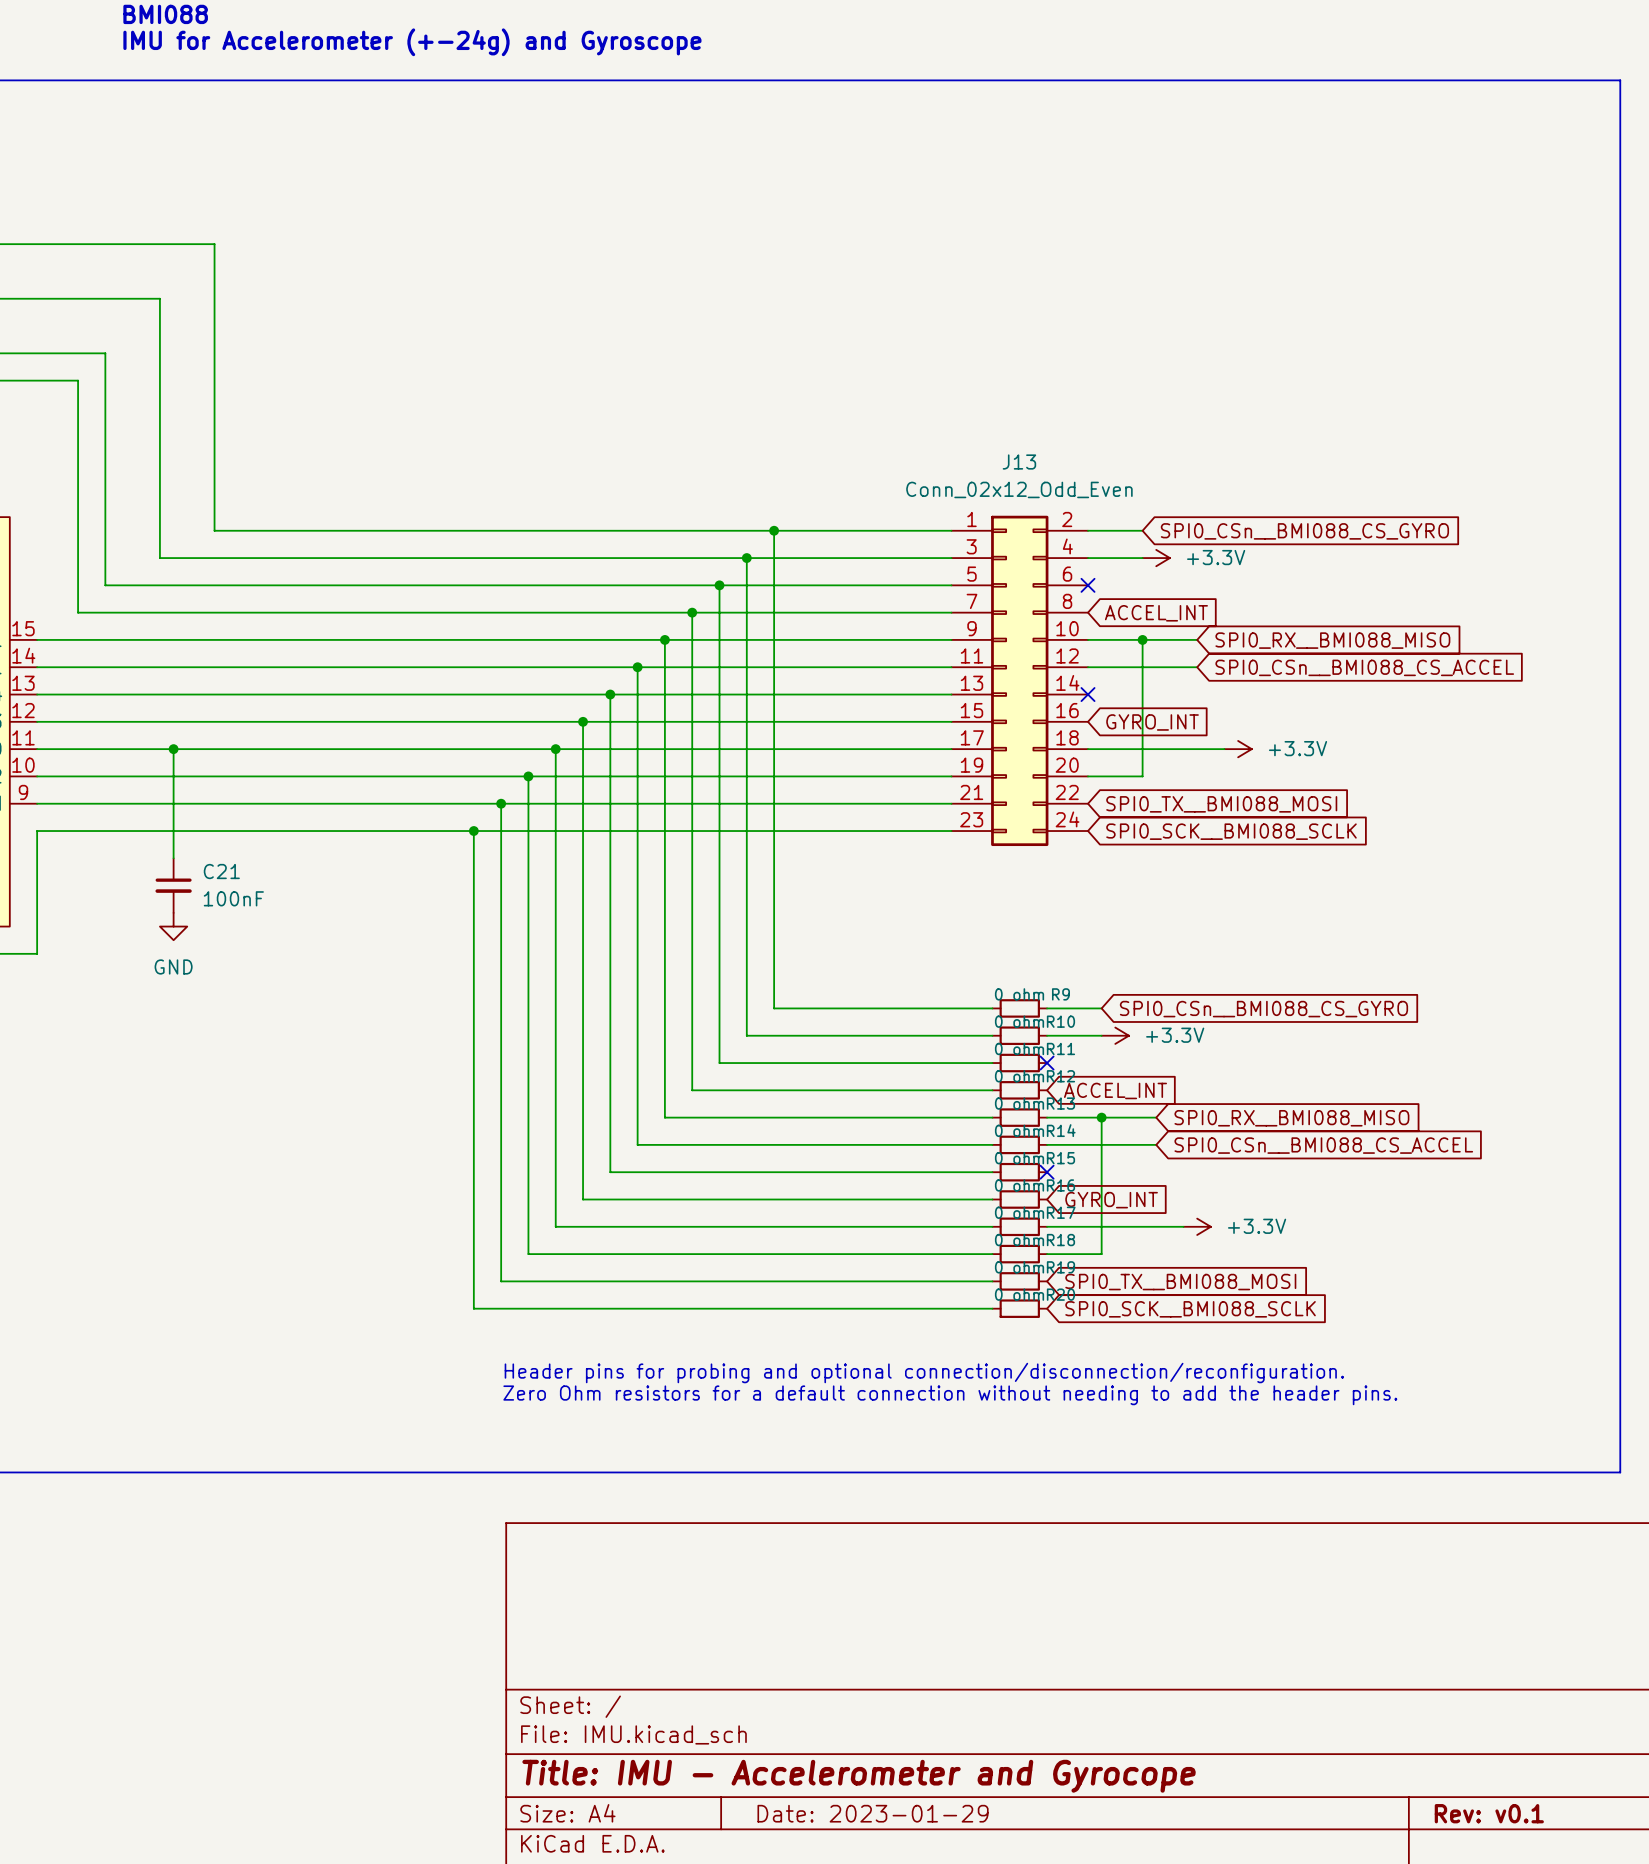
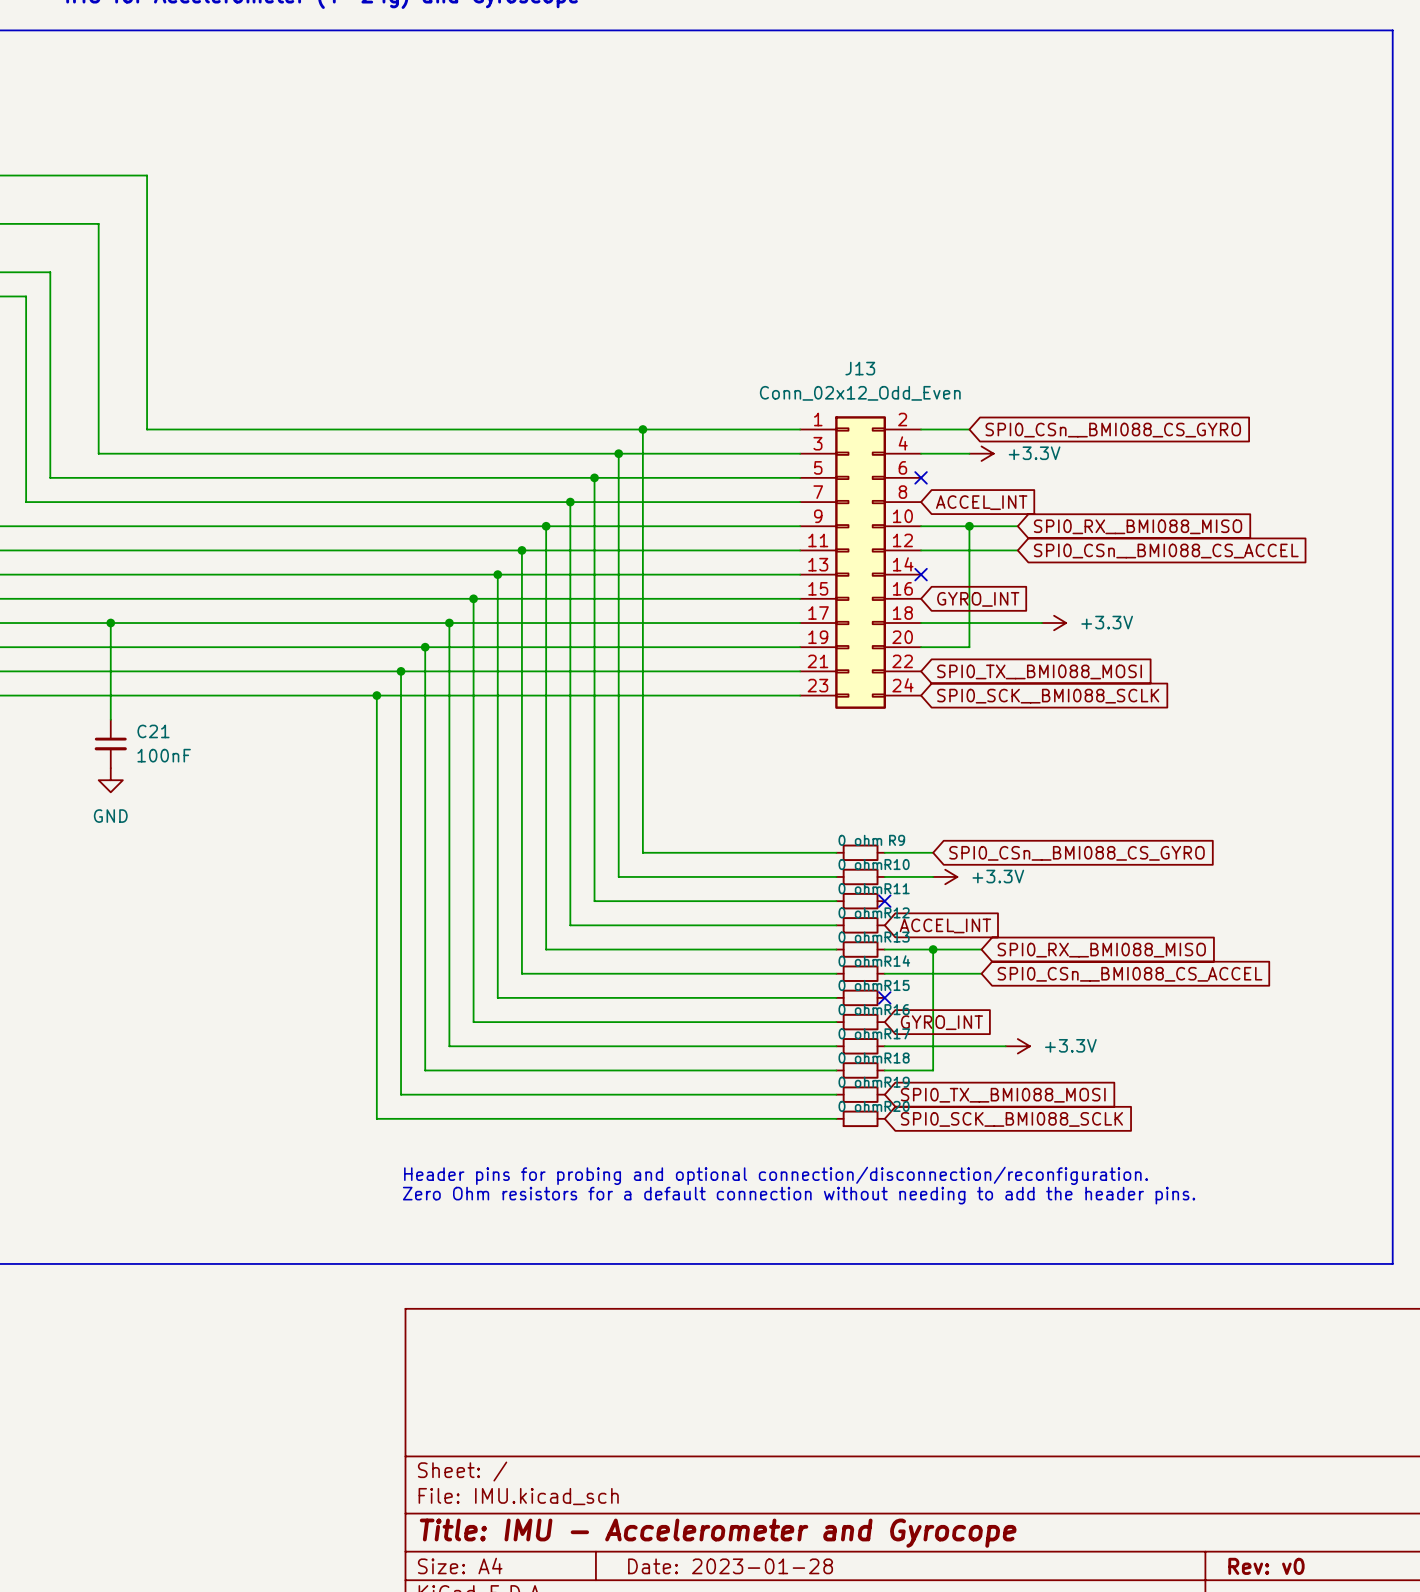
title block: Date: 2023-01-29 (873, 1813) -> Date: 2023-01-28 (730, 1566)
title block: Rev: v0.1 (1489, 1813) -> Rev: v0 (1266, 1566)

